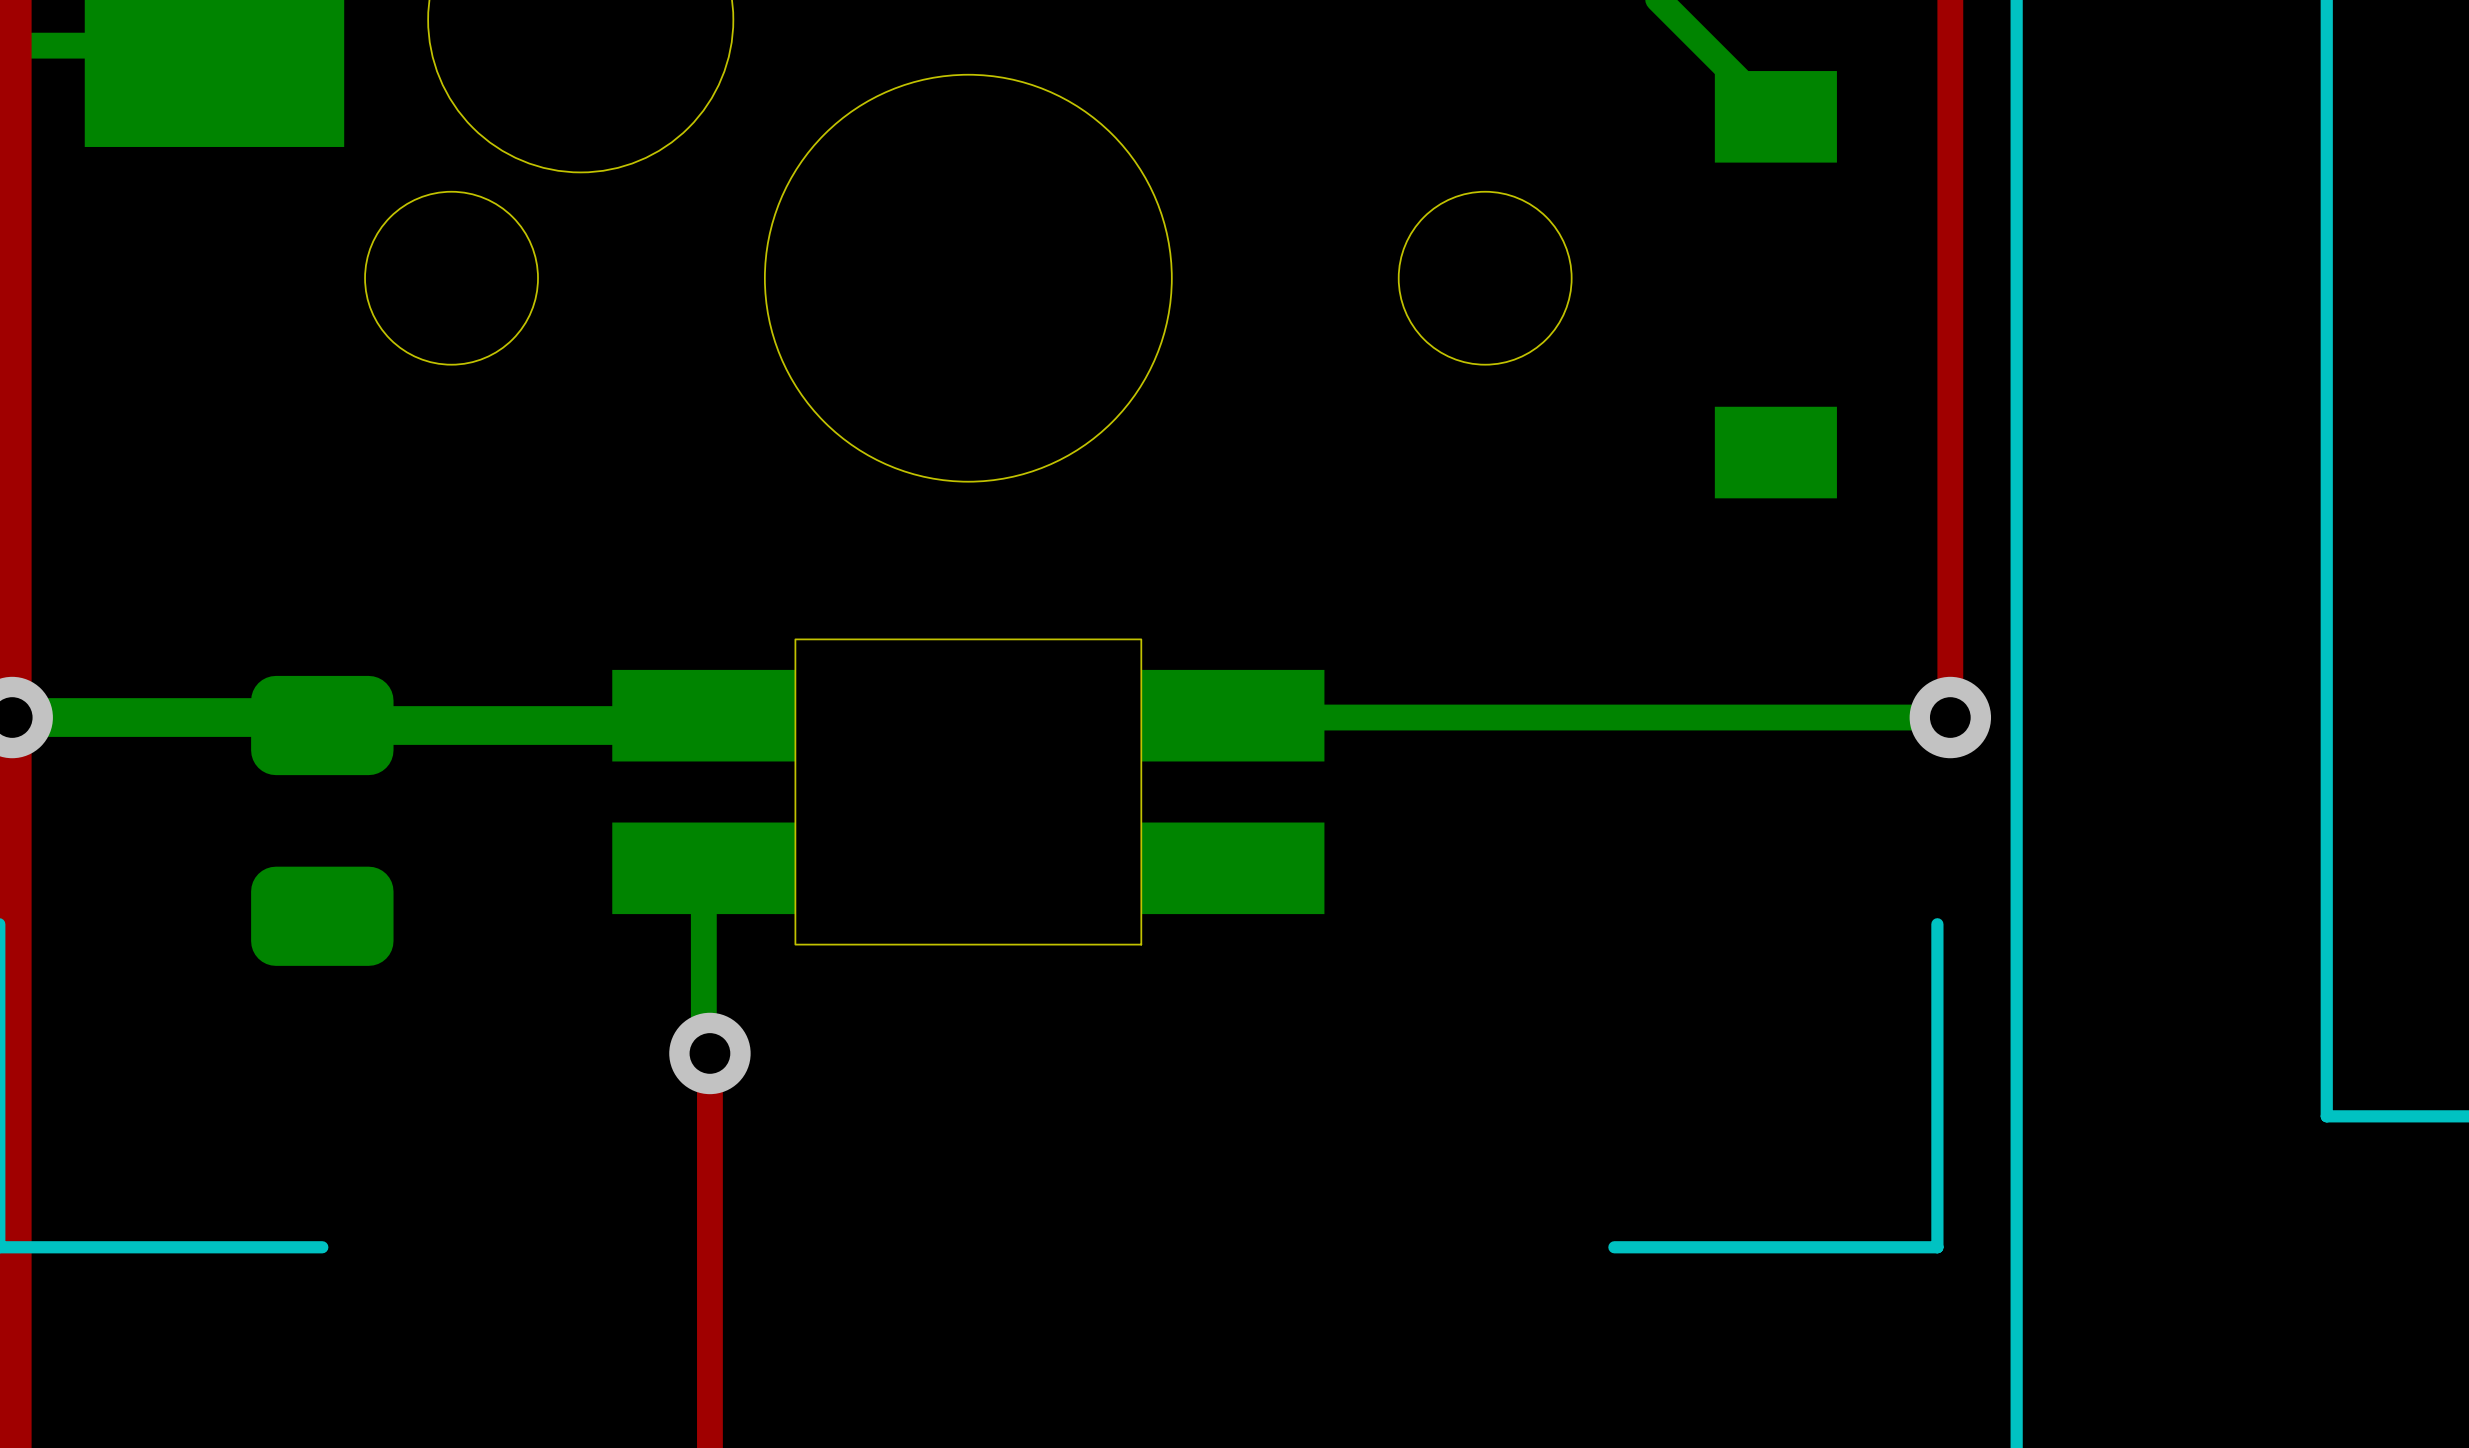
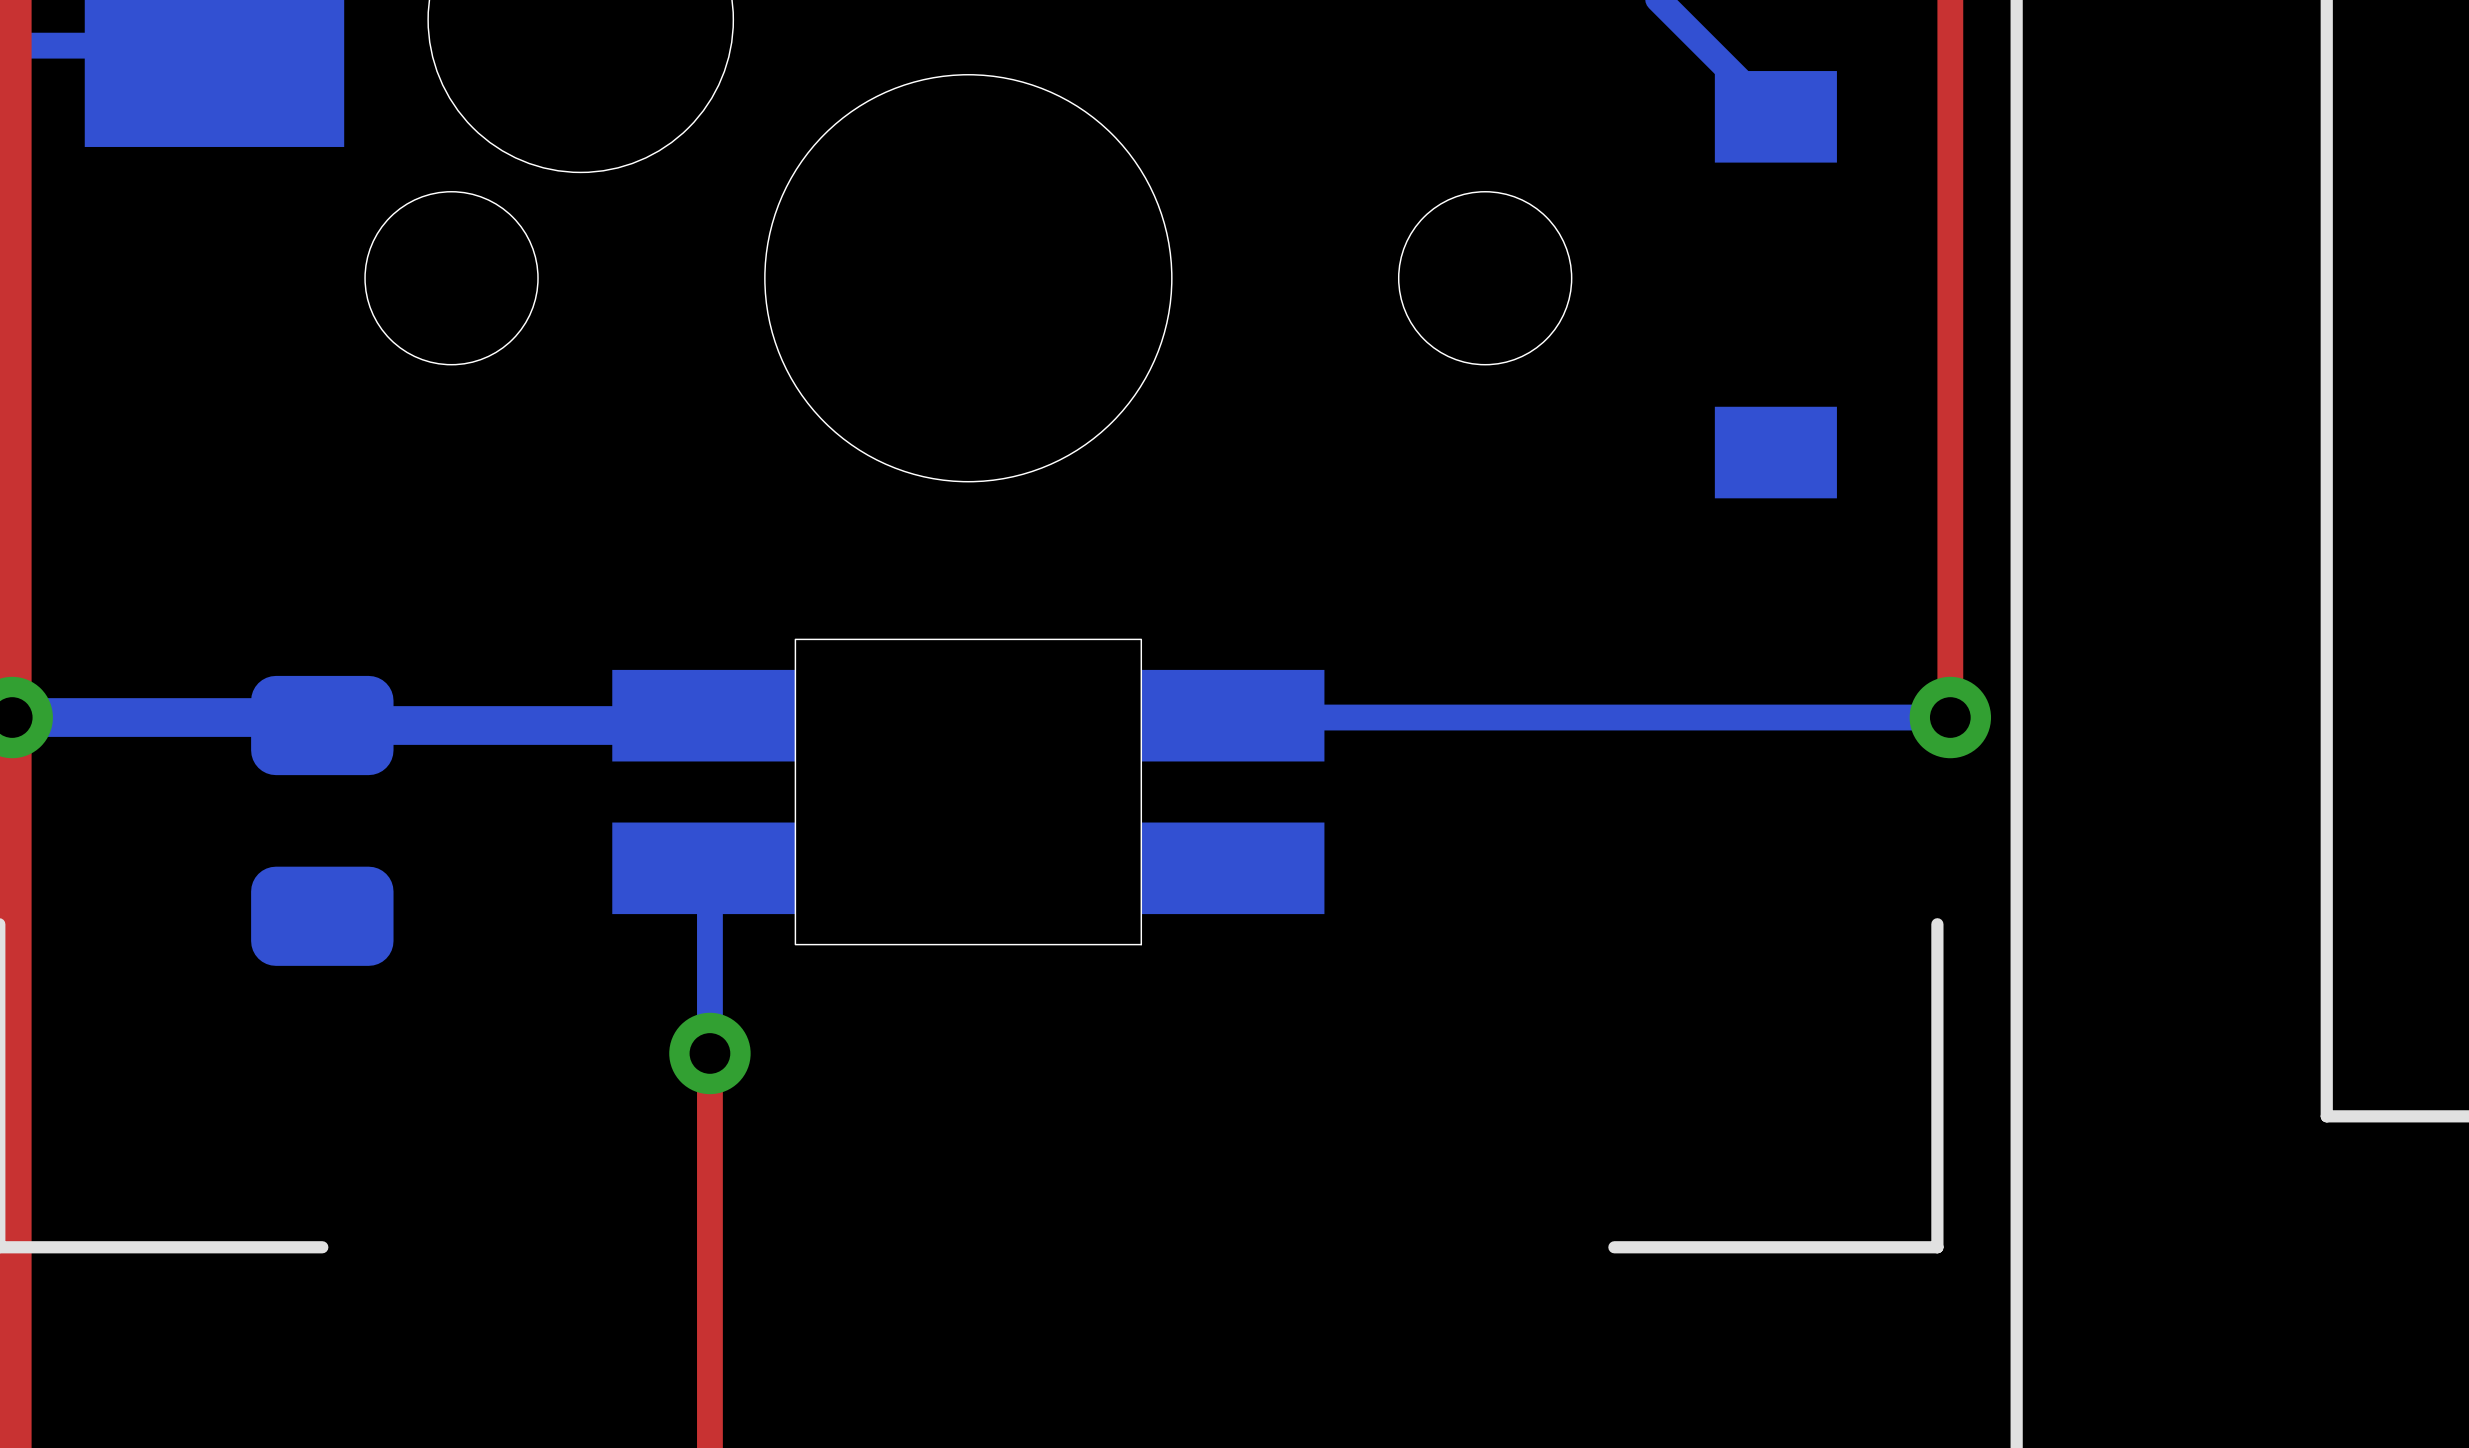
bottom track: none -> (703, 868) (709, 874) (709, 1053)
bottom track: (703, 874) (703, 1047) -> none

